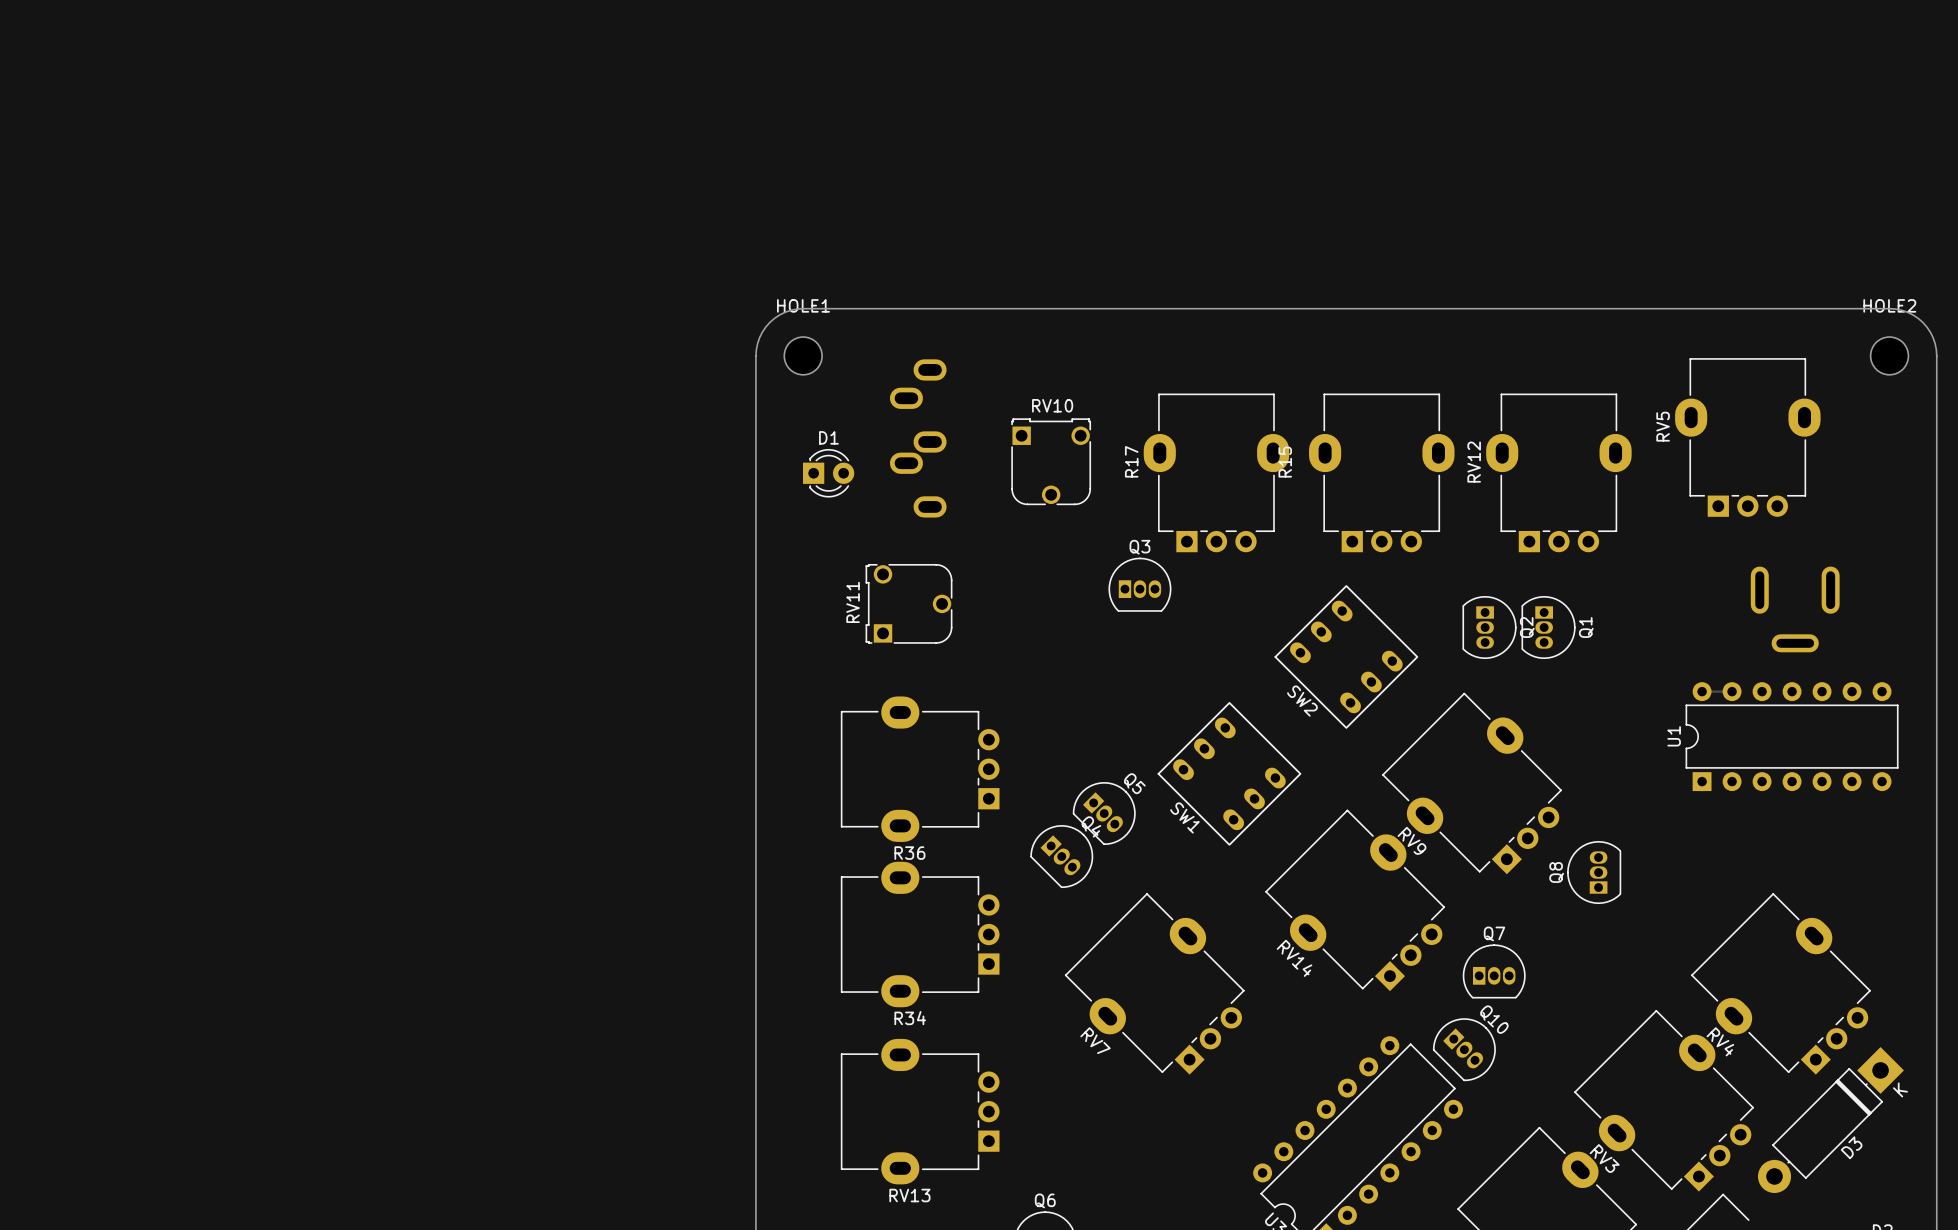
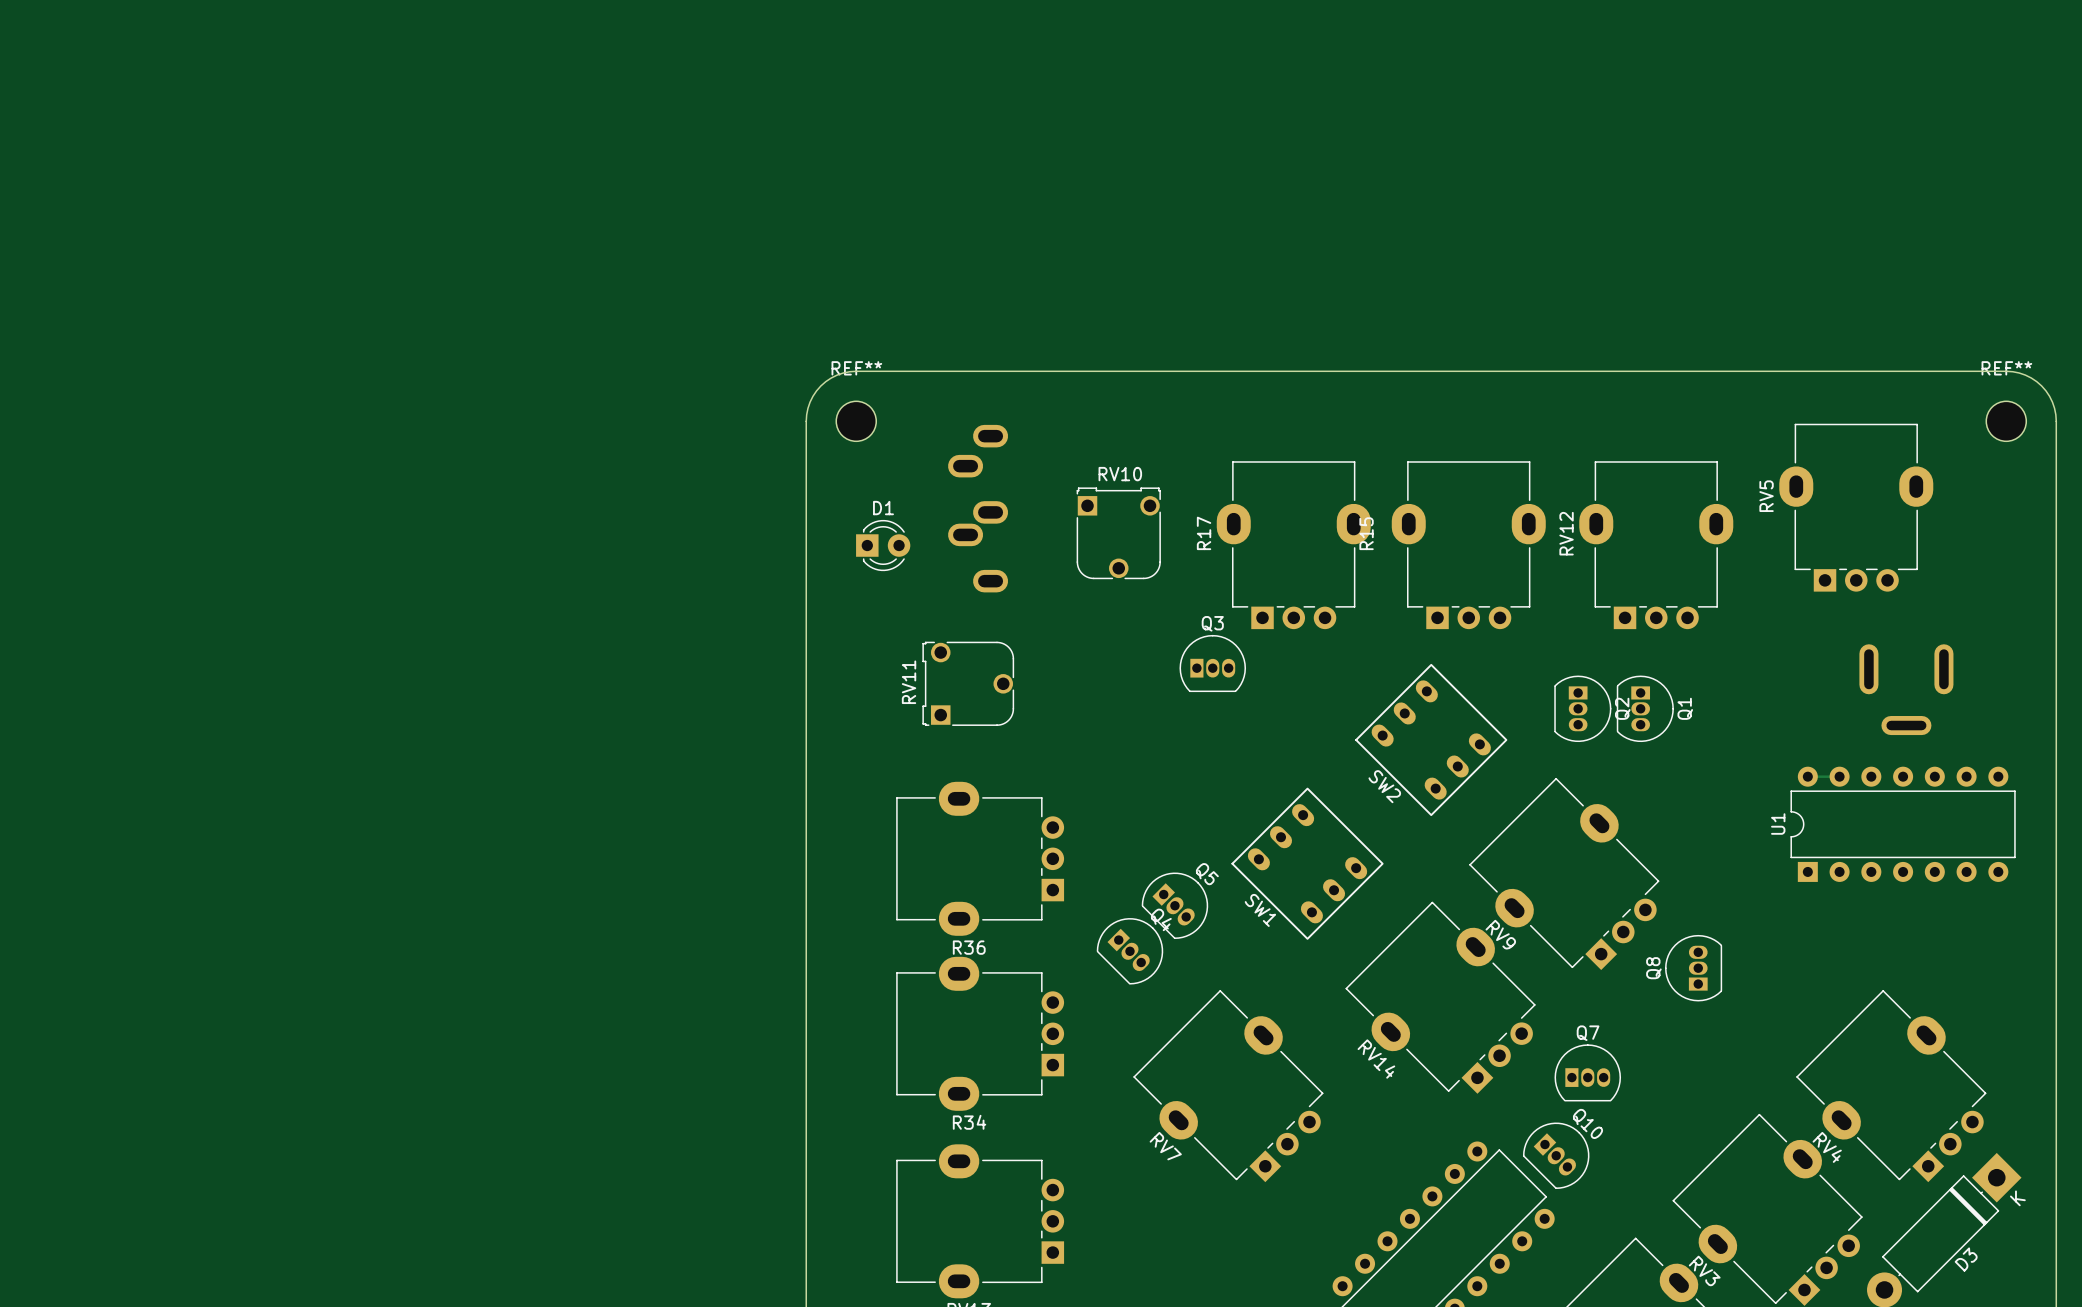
HOLE1 name: HOLE1 (803, 305) -> REF** (856, 368)
HOLE2 name: HOLE2 (1889, 305) -> REF** (2006, 368)

